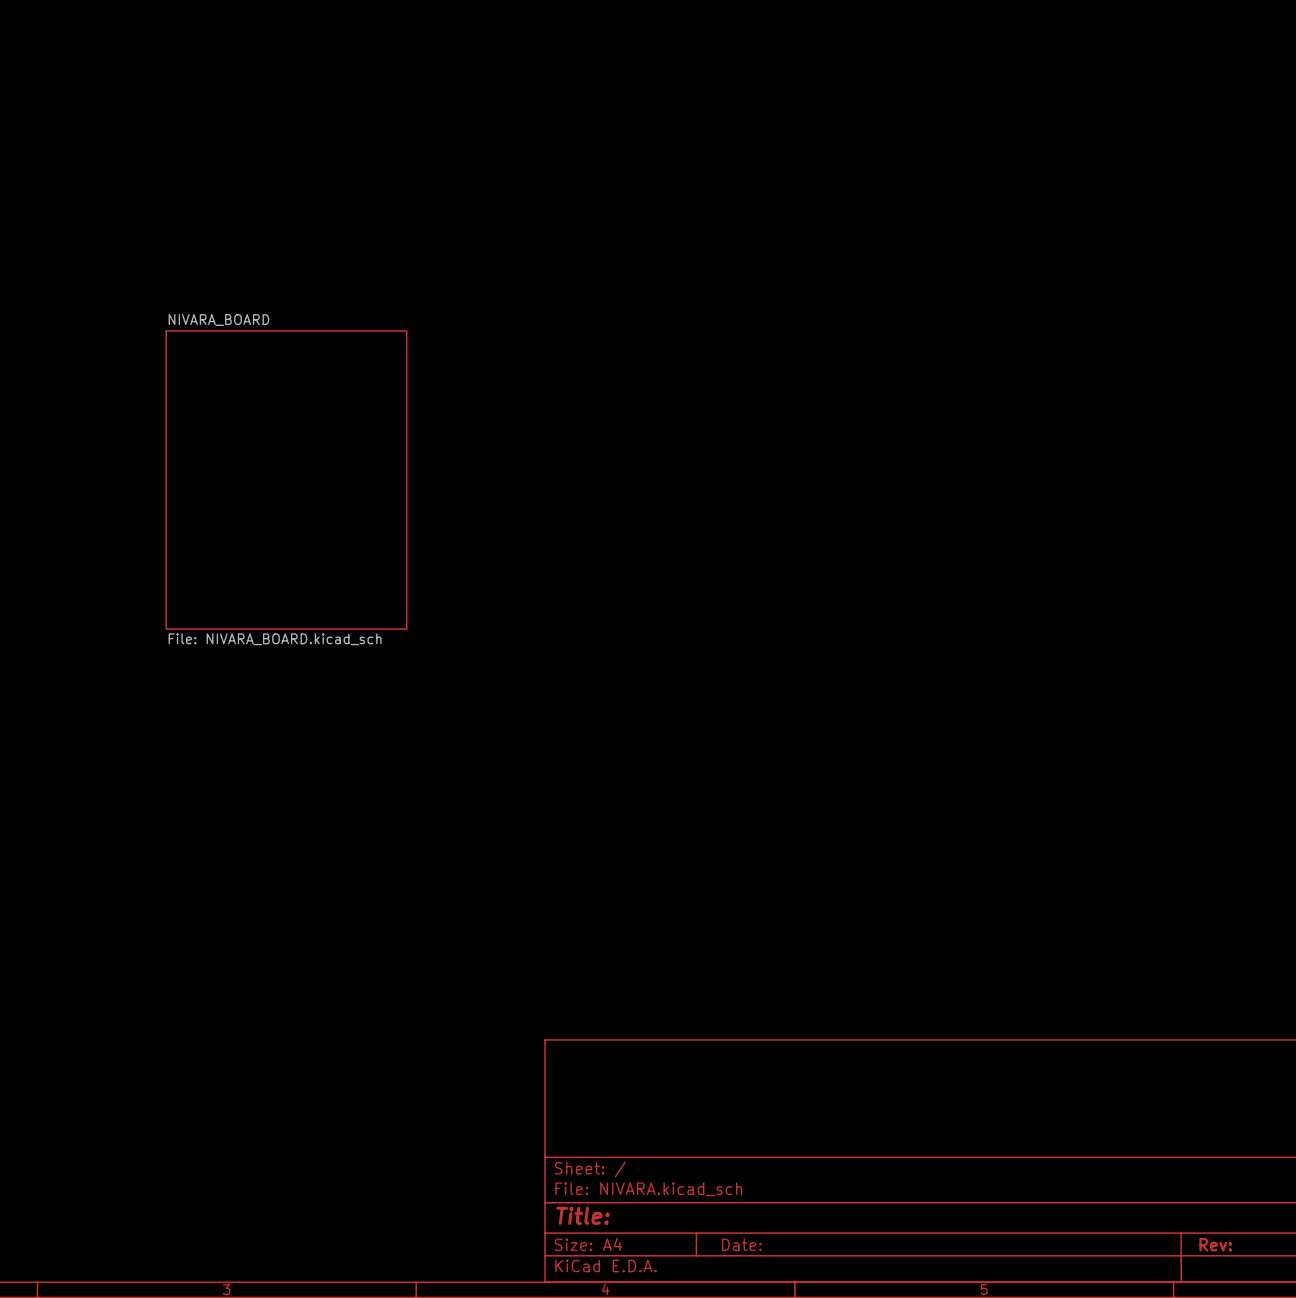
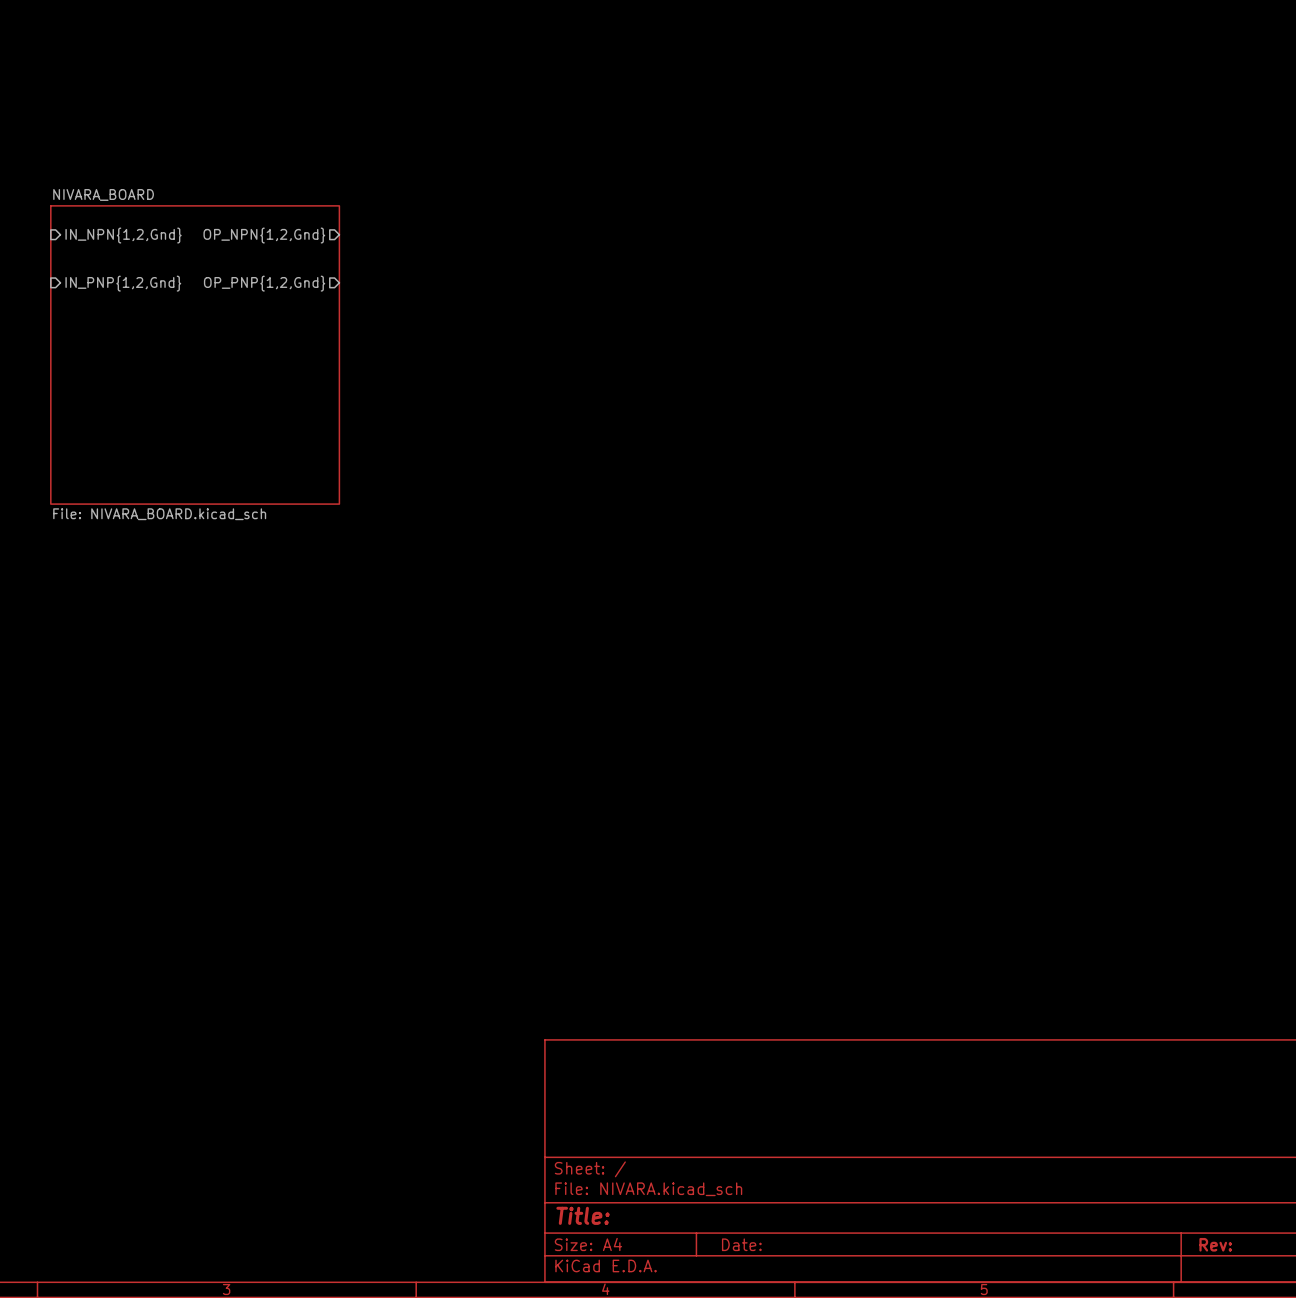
sheet pin: none -> IN_NPN{1,2,Gnd} (123, 235)
sheet pin: none -> OP_NPN{1,2,Gnd} (264, 235)
sheet pin: none -> IN_PNP{1,2,Gnd} (123, 283)
sheet pin: none -> OP_PNP{1,2,Gnd} (264, 283)
sheet NIVARA_BOARD: none -> File: NIVARA_BOARD.kicad_sch (195, 354)
sheet NIVARA_BOARD: File: NIVARA_BOARD.kicad_sch (286, 480) -> none

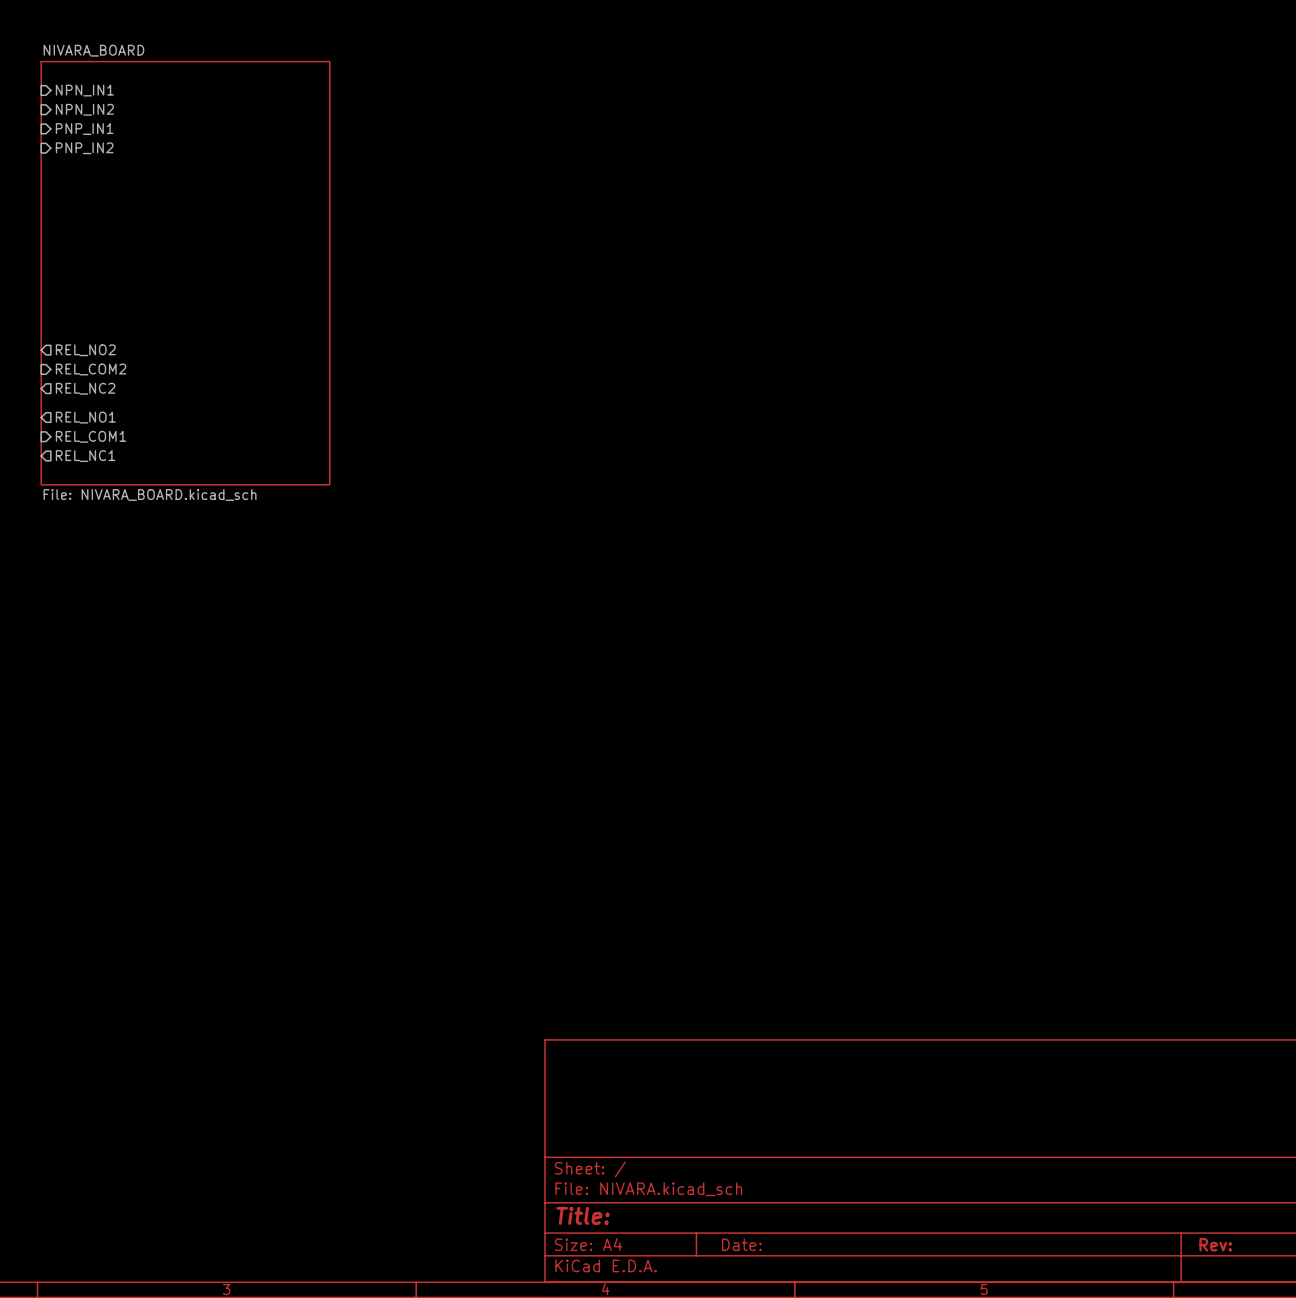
sheet pin: none -> NPN_IN1 (84, 90)
sheet pin: none -> NPN_IN2 (84, 109)
sheet pin: none -> PNP_IN1 (84, 129)
sheet pin: none -> PNP_IN2 (84, 148)
sheet pin: IN_NPN{1,2,Gnd} (123, 235) -> none
sheet pin: OP_NPN{1,2,Gnd} (264, 235) -> none
sheet NIVARA_BOARD: none -> File: NIVARA_BOARD.kicad_sch (185, 273)
sheet pin: IN_PNP{1,2,Gnd} (123, 283) -> none
sheet pin: OP_PNP{1,2,Gnd} (264, 283) -> none
sheet pin: none -> REL_NO2 (85, 350)
sheet NIVARA_BOARD: File: NIVARA_BOARD.kicad_sch (195, 354) -> none
sheet pin: none -> REL_COM2 (91, 369)
sheet pin: none -> REL_NC2 (85, 388)
sheet pin: none -> REL_NO1 (85, 417)
sheet pin: none -> REL_COM1 (91, 436)
sheet pin: none -> REL_NC1 (85, 456)

